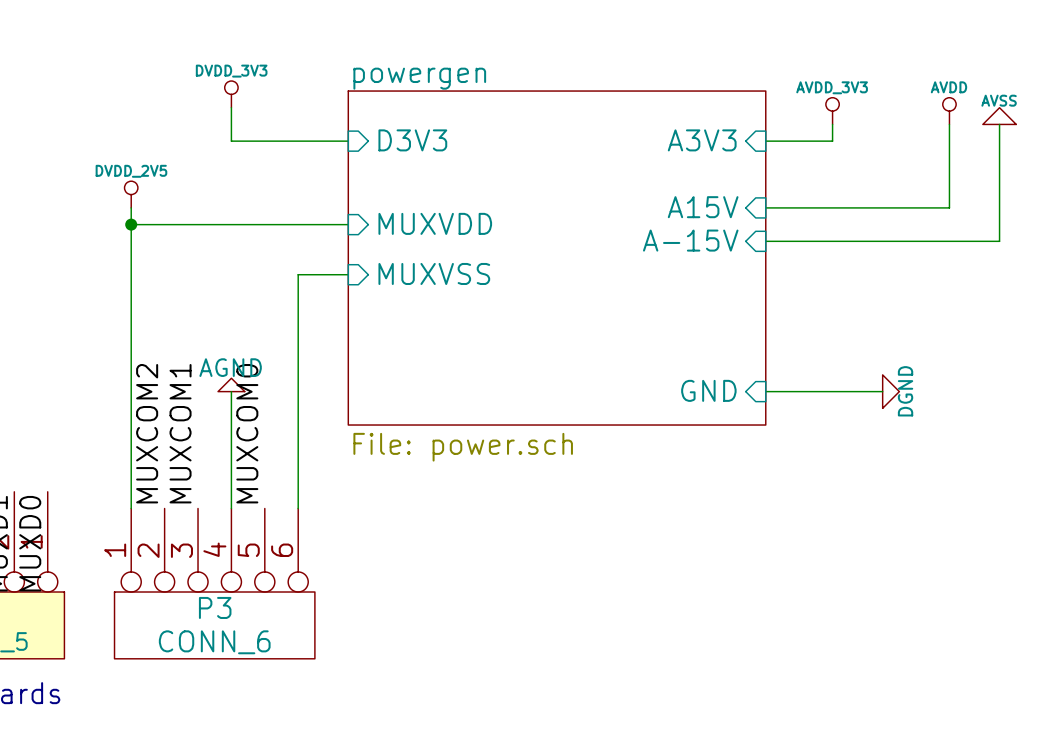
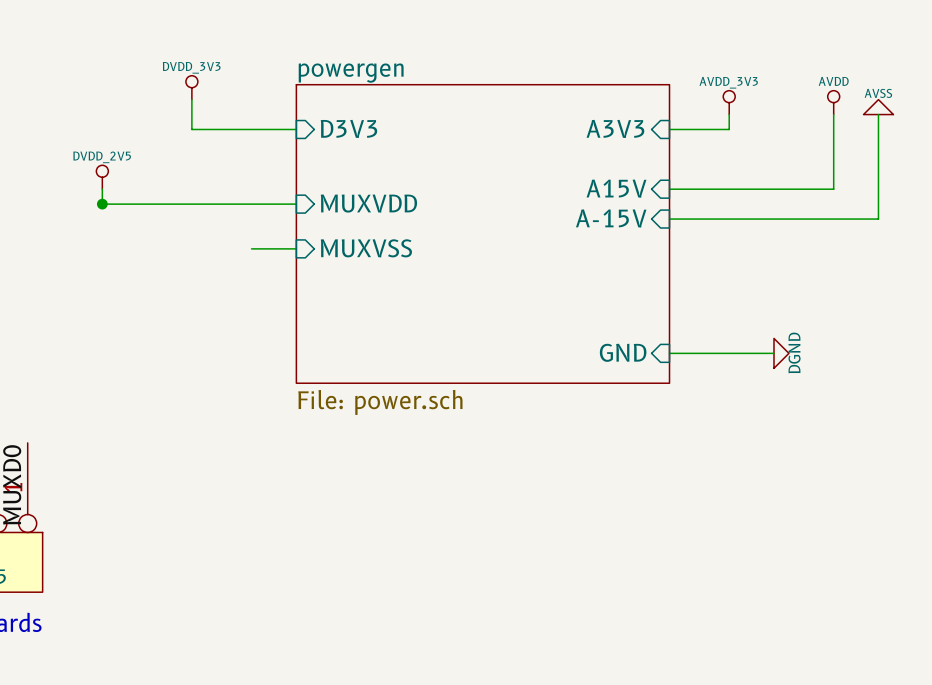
wire: (131, 224) (131, 508) -> none
wire: (298, 274) (298, 508) -> none
power symbol: AGND (231, 384) -> none
wire: (231, 391) (231, 508) -> none
label: MUXCOM2 (147, 433) -> none
label: MUXCOM1 (180, 433) -> none
label: MUXCOM0 (247, 433) -> none
P3: CONN_6 (214, 583) -> none

